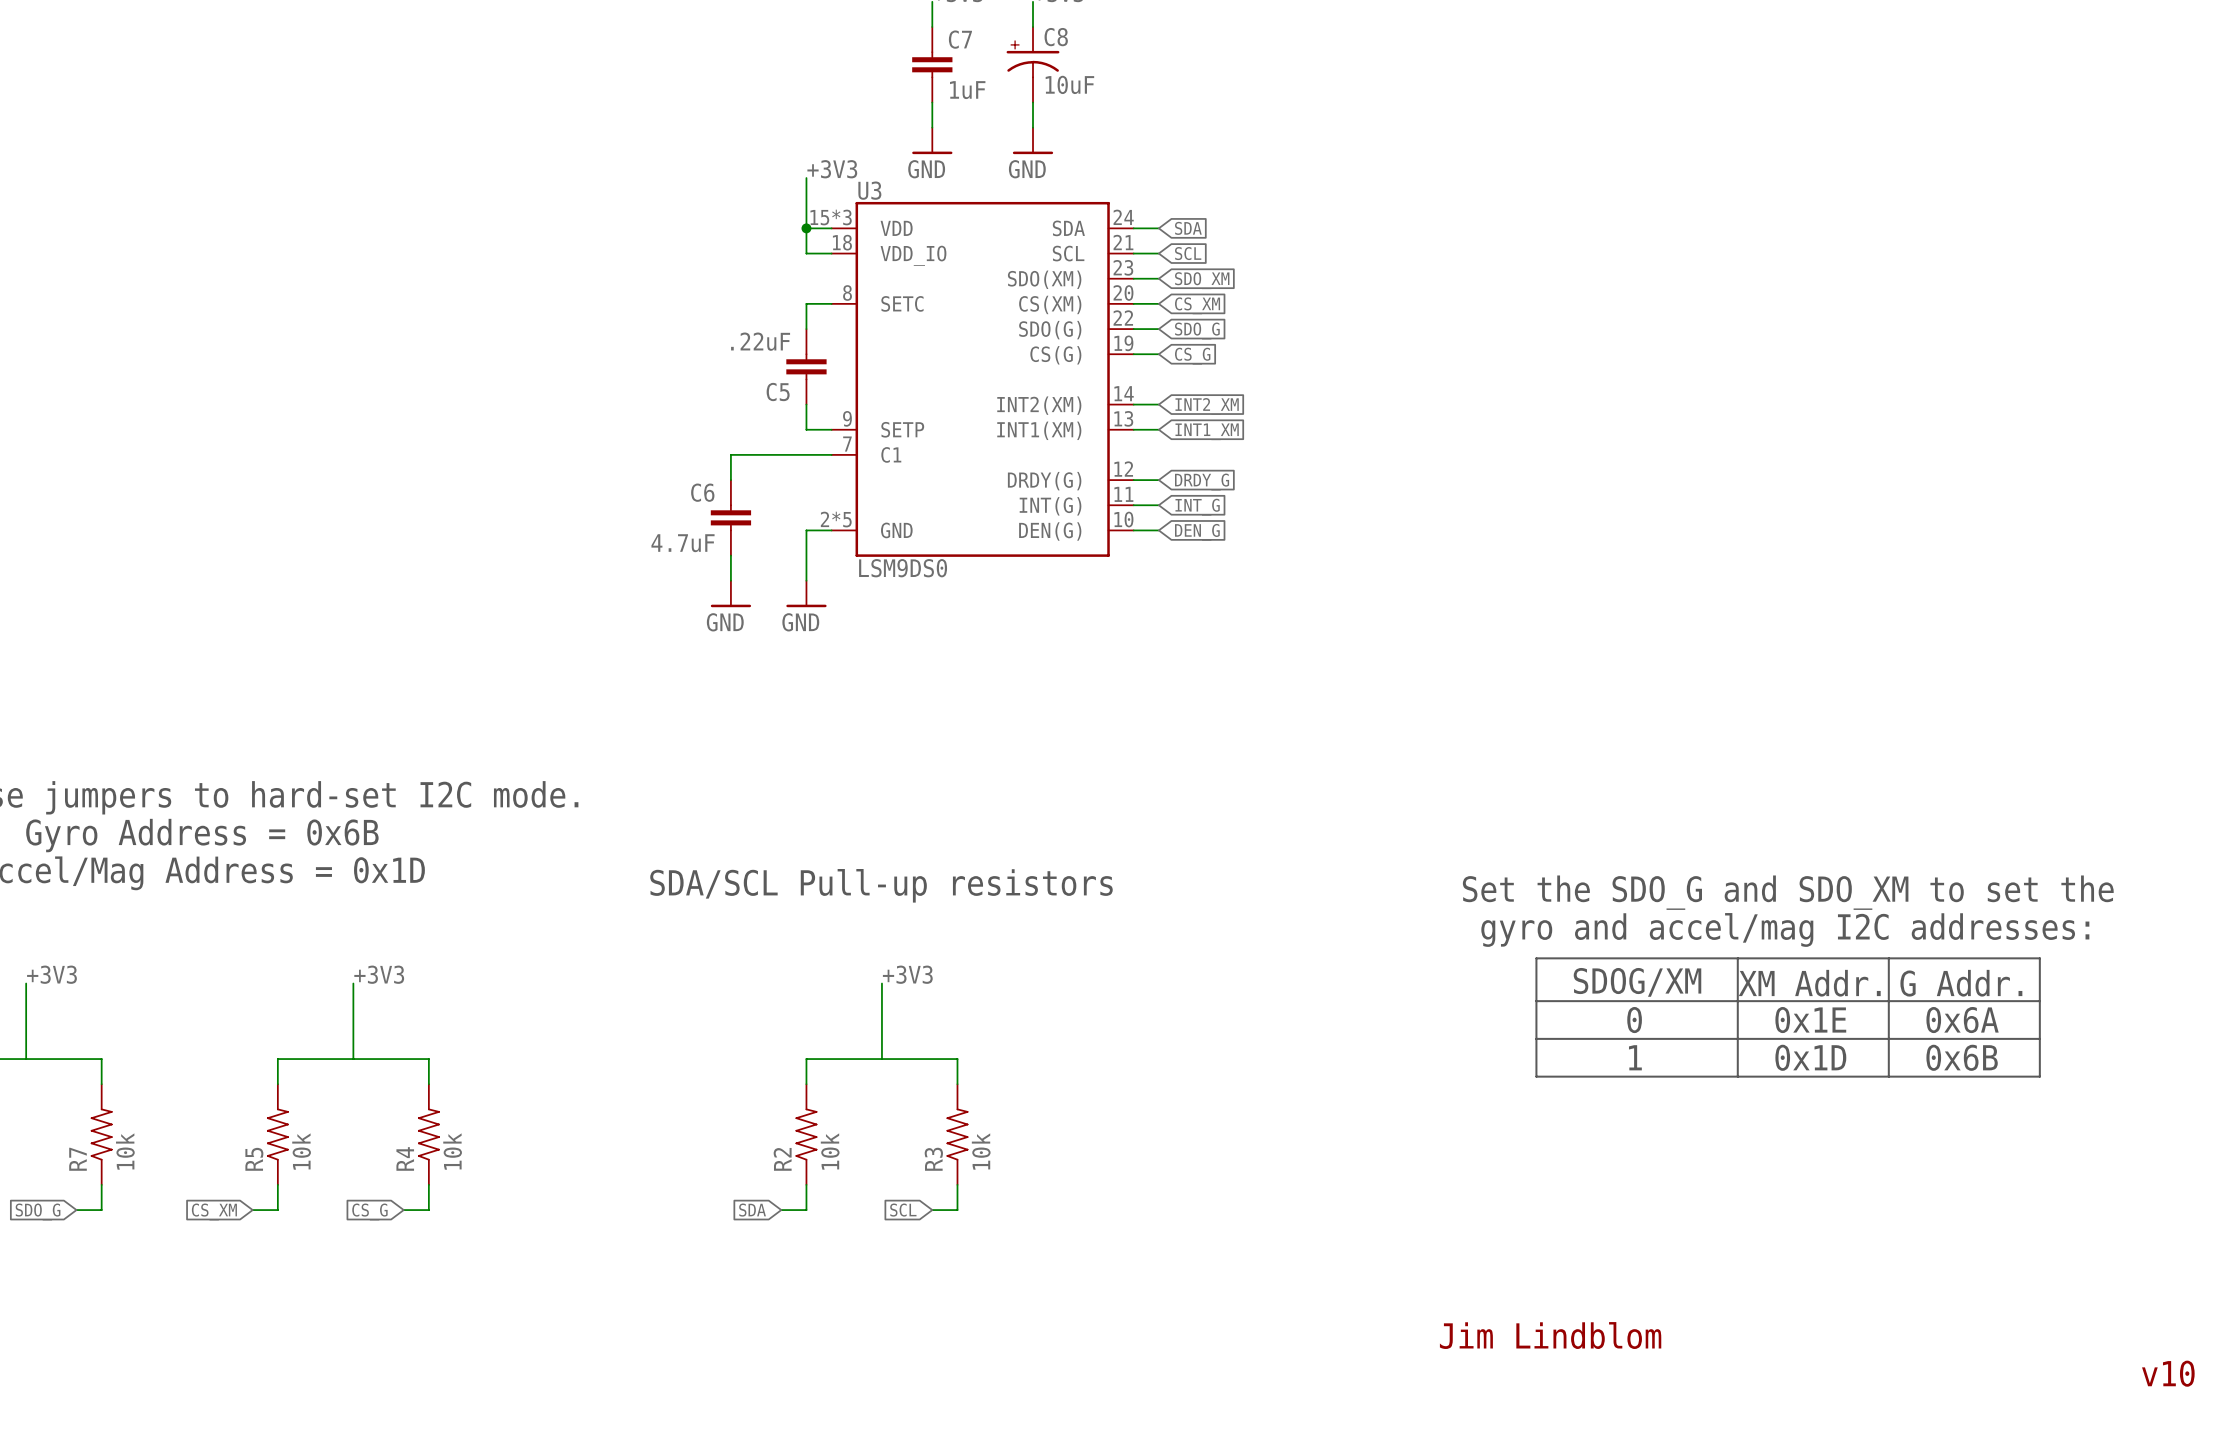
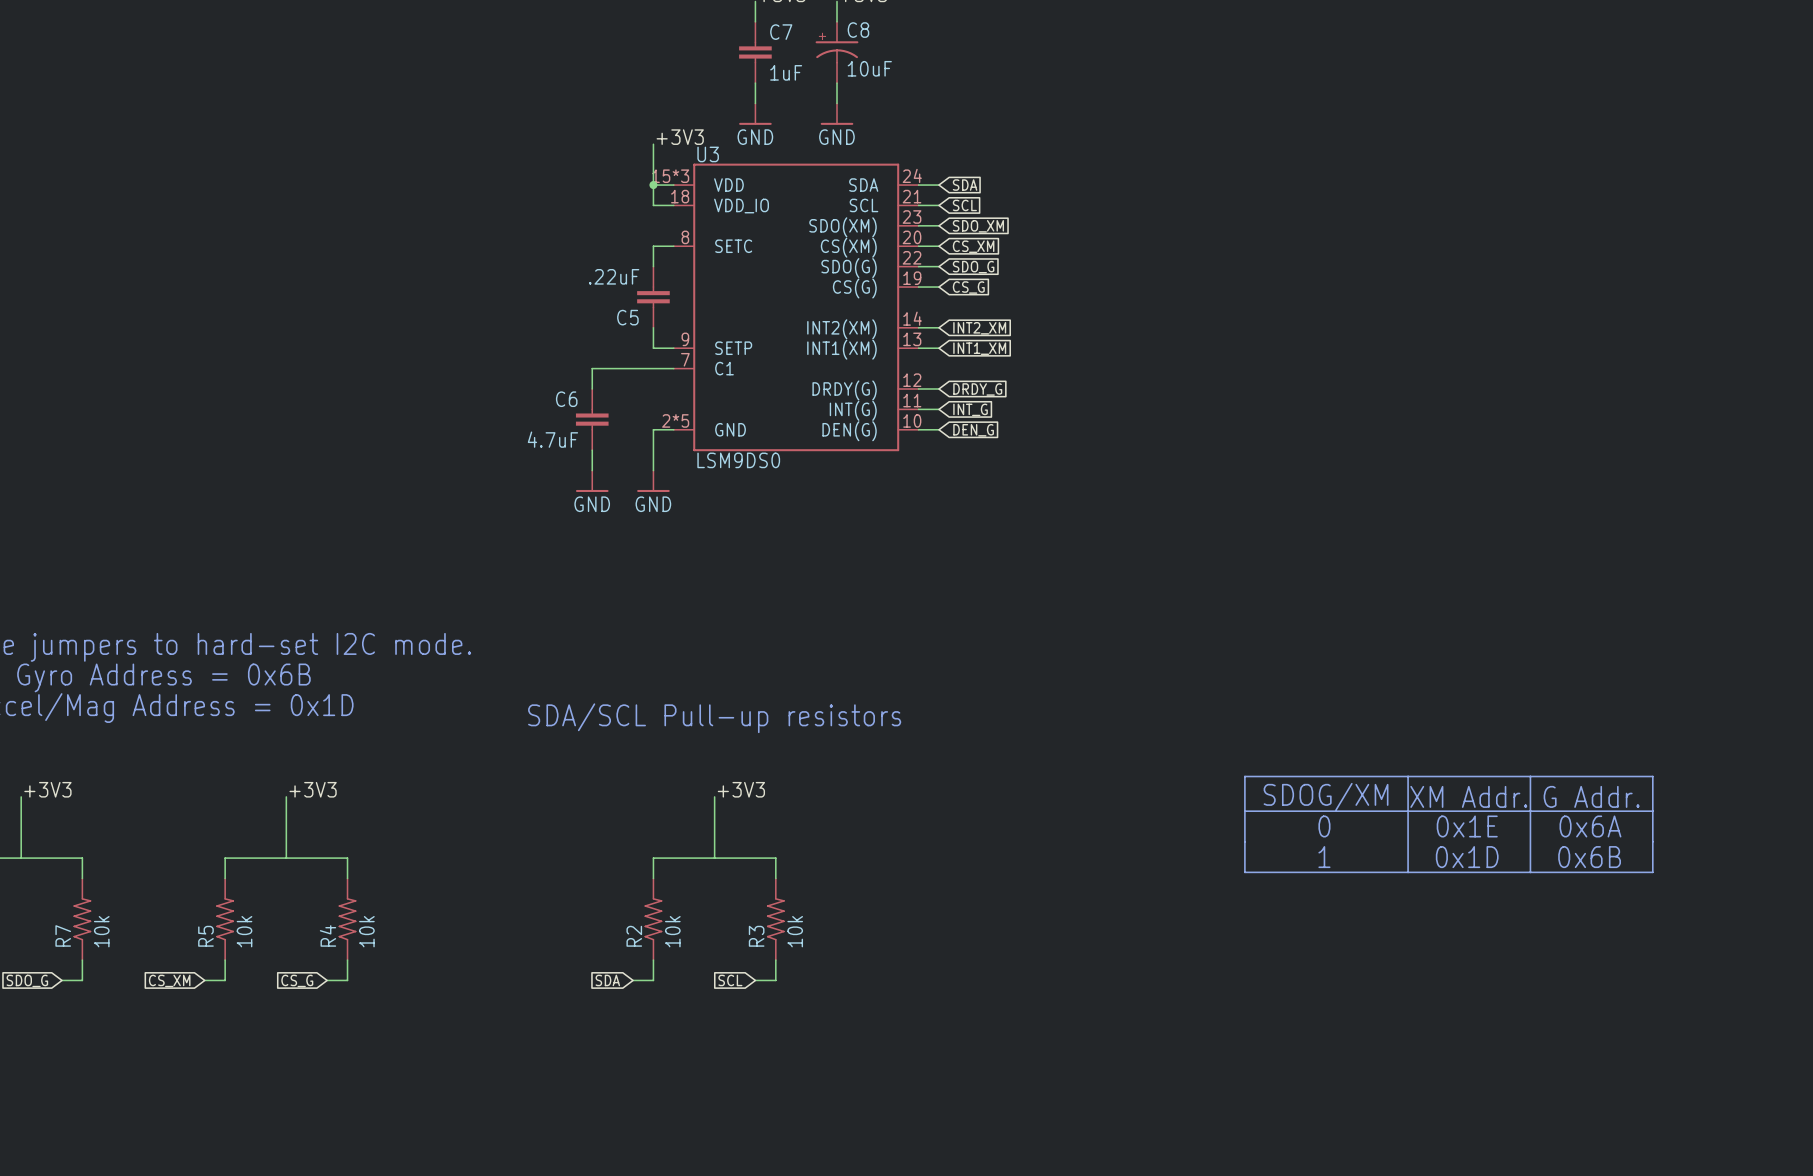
text: Set the SDO_G and SDO_XM to set the (1788, 892) -> none
text: gyro and accel/mag I2C addresses: (1785, 929) -> none
line: (1536, 1038) (2039, 1038) -> none
text: Jim Lindblom (1550, 1335) -> none
text: v10 (2168, 1373) -> none

